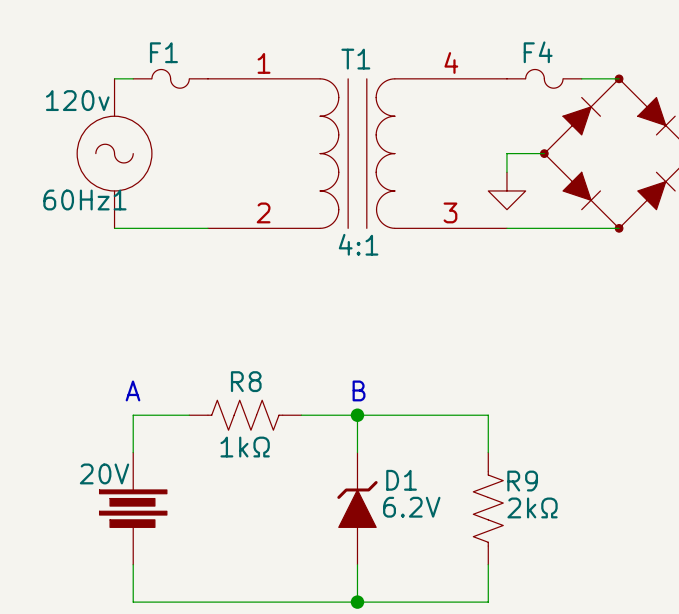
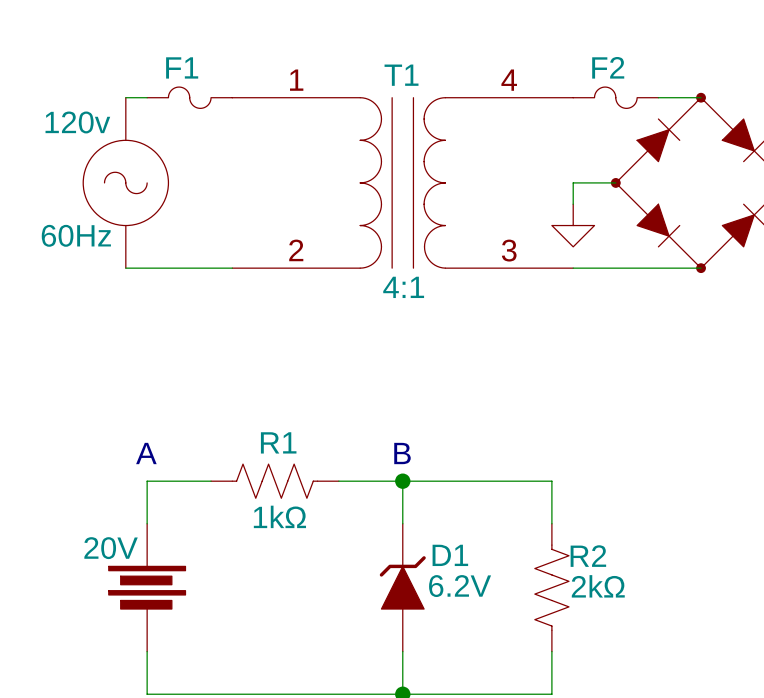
F4 name: F4 (538, 52) -> F2 (608, 67)
60Hz1 name: 60Hz1 (84, 199) -> 60Hz (76, 235)
R8 name: R8 (246, 381) -> R1 (278, 442)
R9 name: R9 (522, 481) -> R2 (588, 556)

